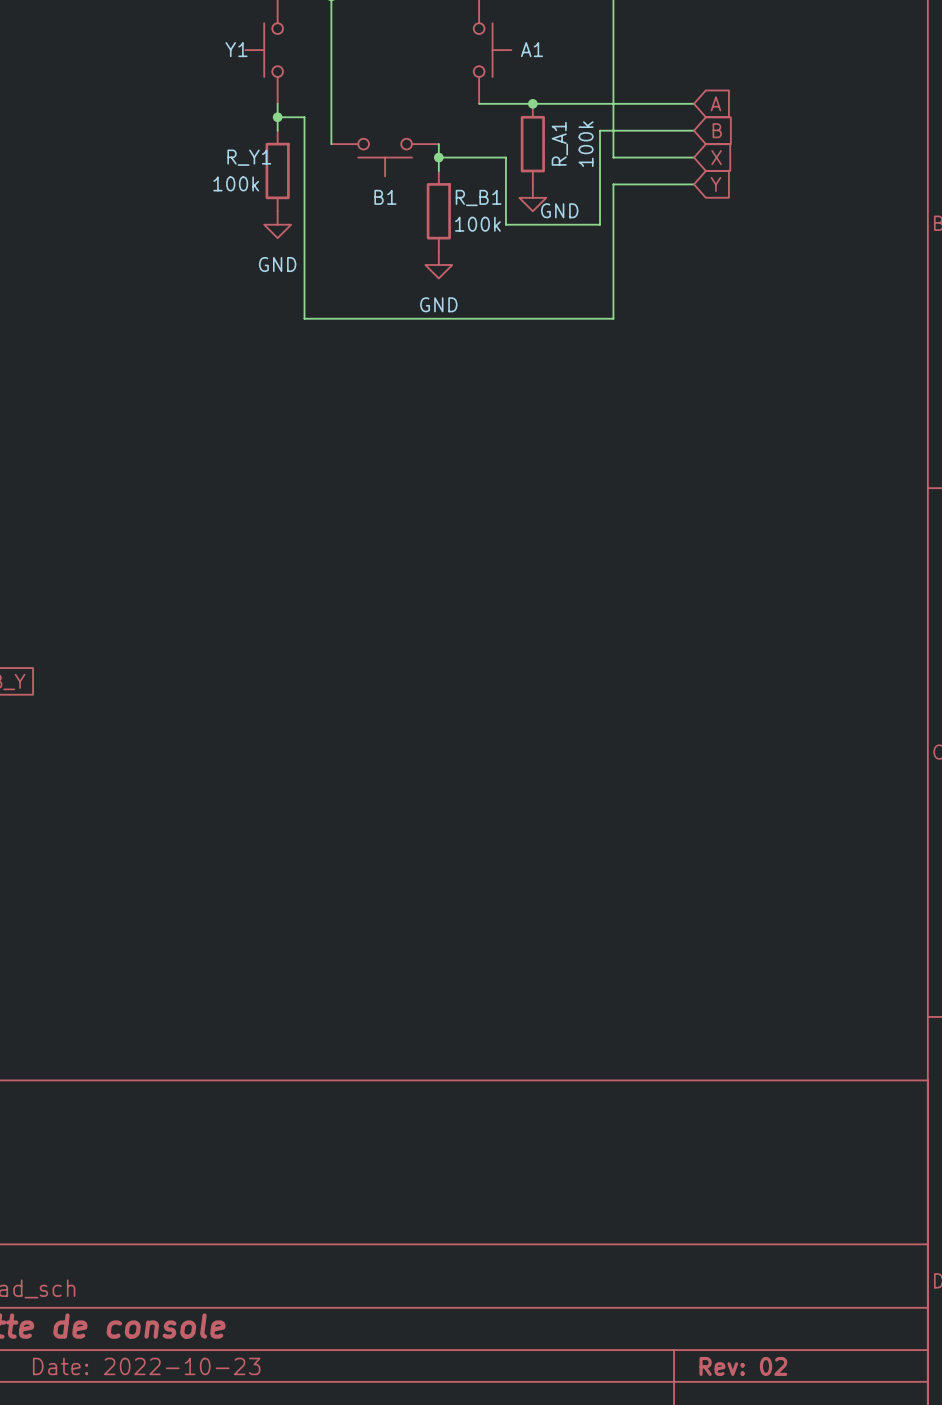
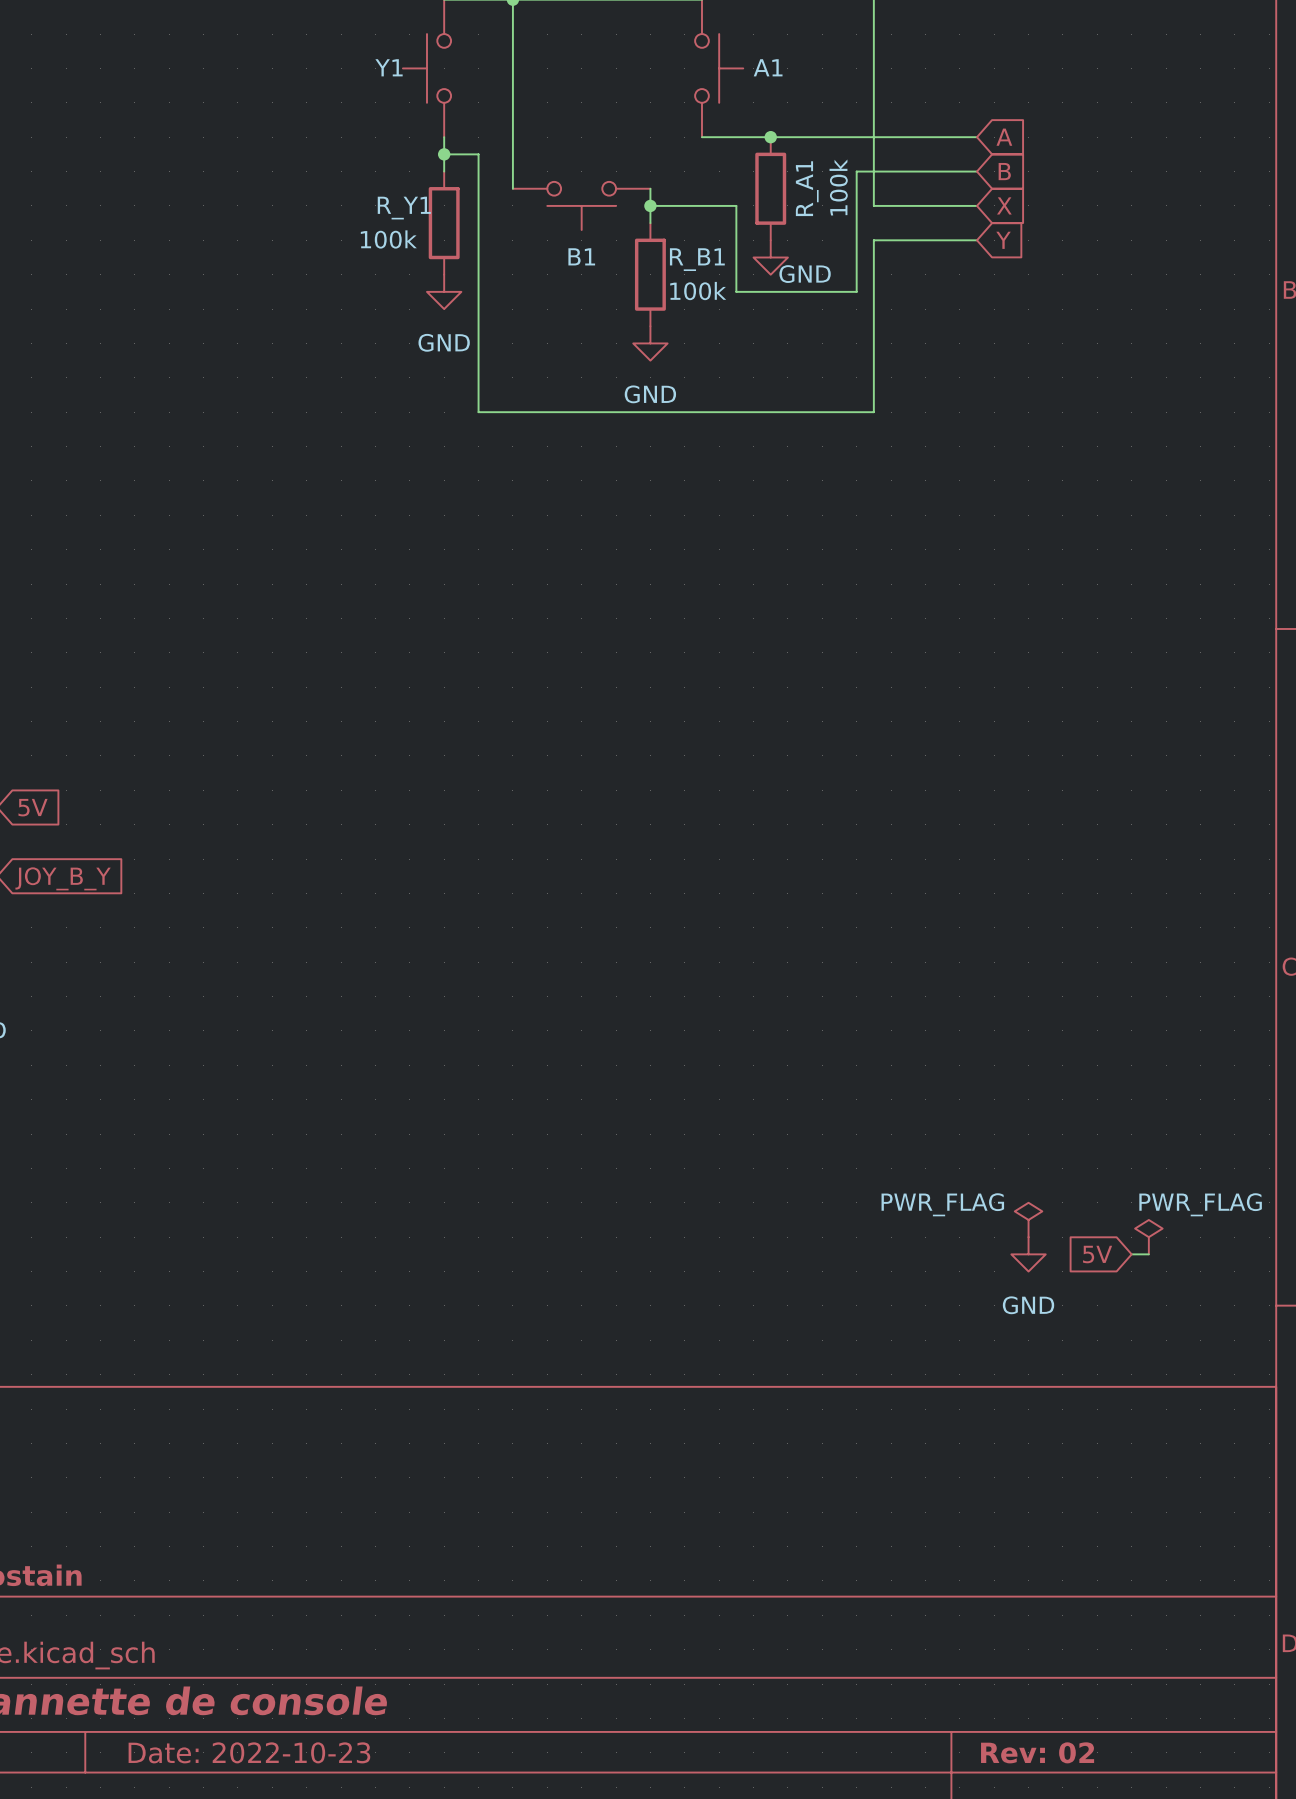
power symbol: none -> PWR_FLAG (1028, 1219)
power symbol: none -> PWR_FLAG (1148, 1237)
power symbol: none -> GND (1028, 1254)
global label: none -> 5V (1097, 1254)
wire: none -> (1131, 1254) (1148, 1254)

